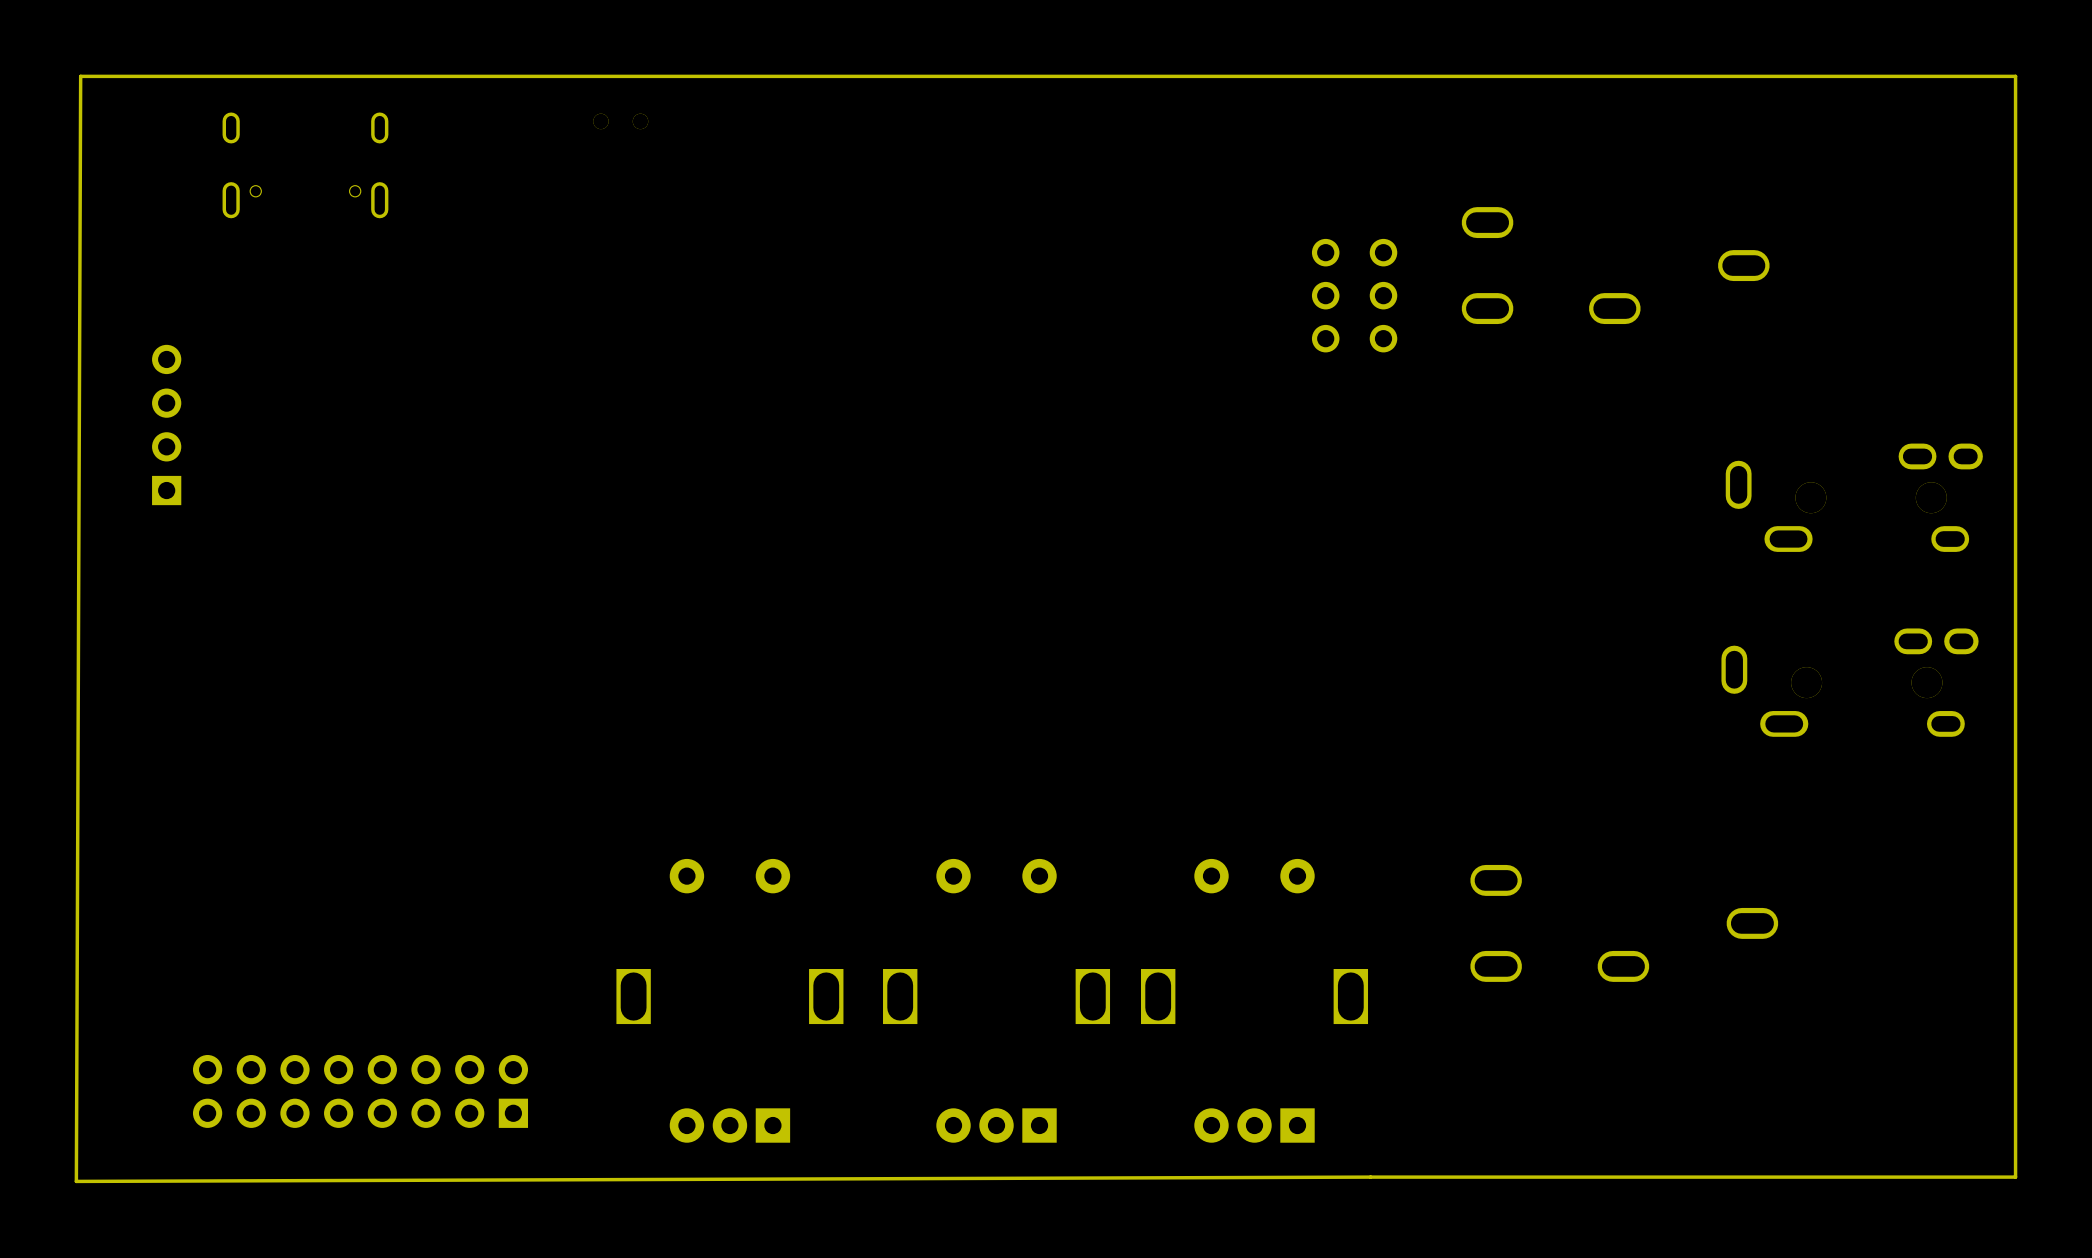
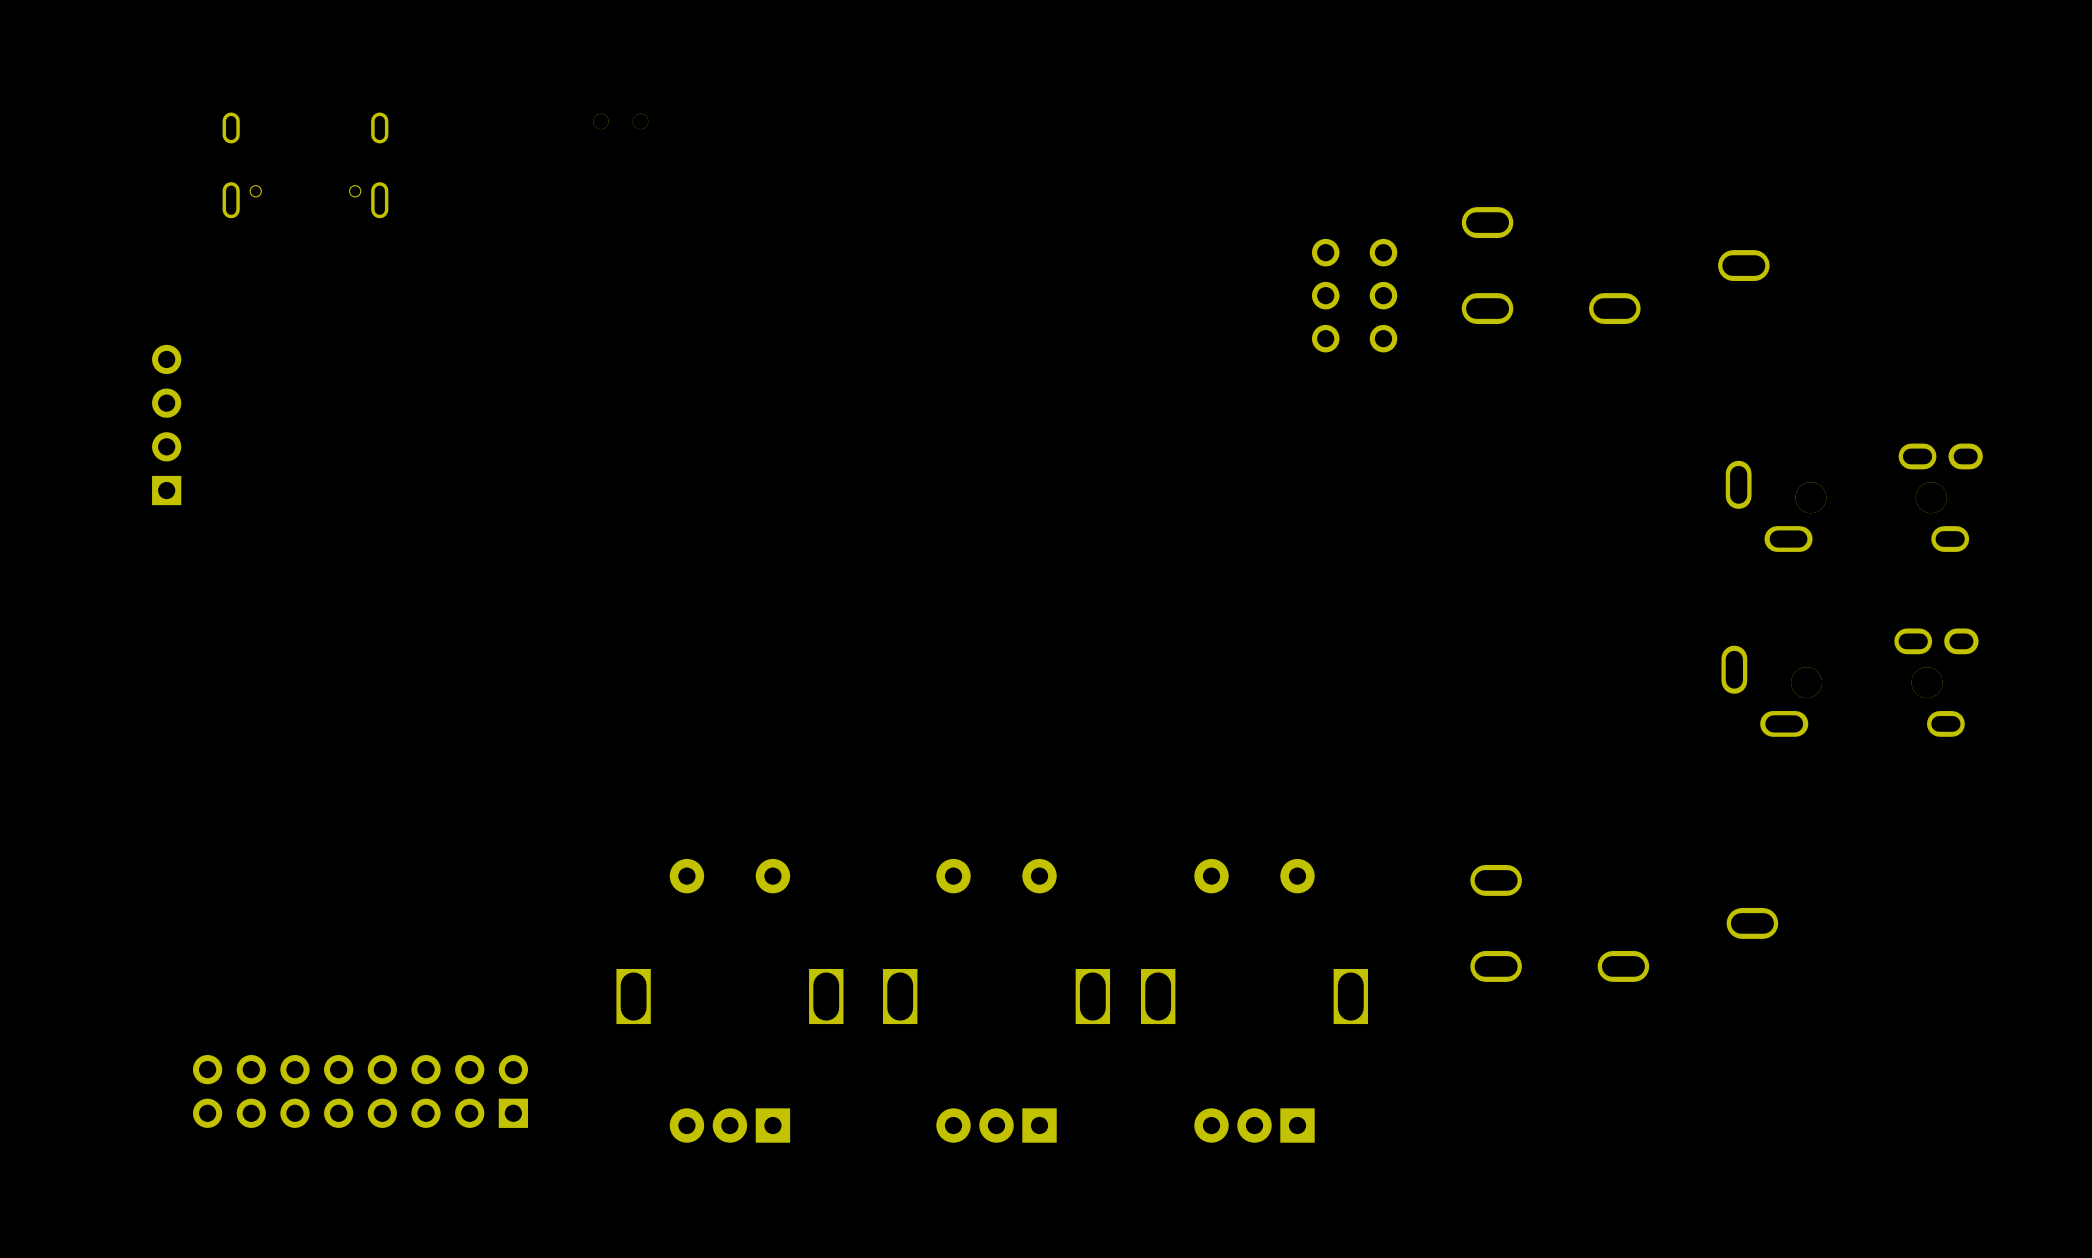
board edge: (2015, 76) (2015, 1177) (76, 1181) (80, 76) (2015, 76) -> none

